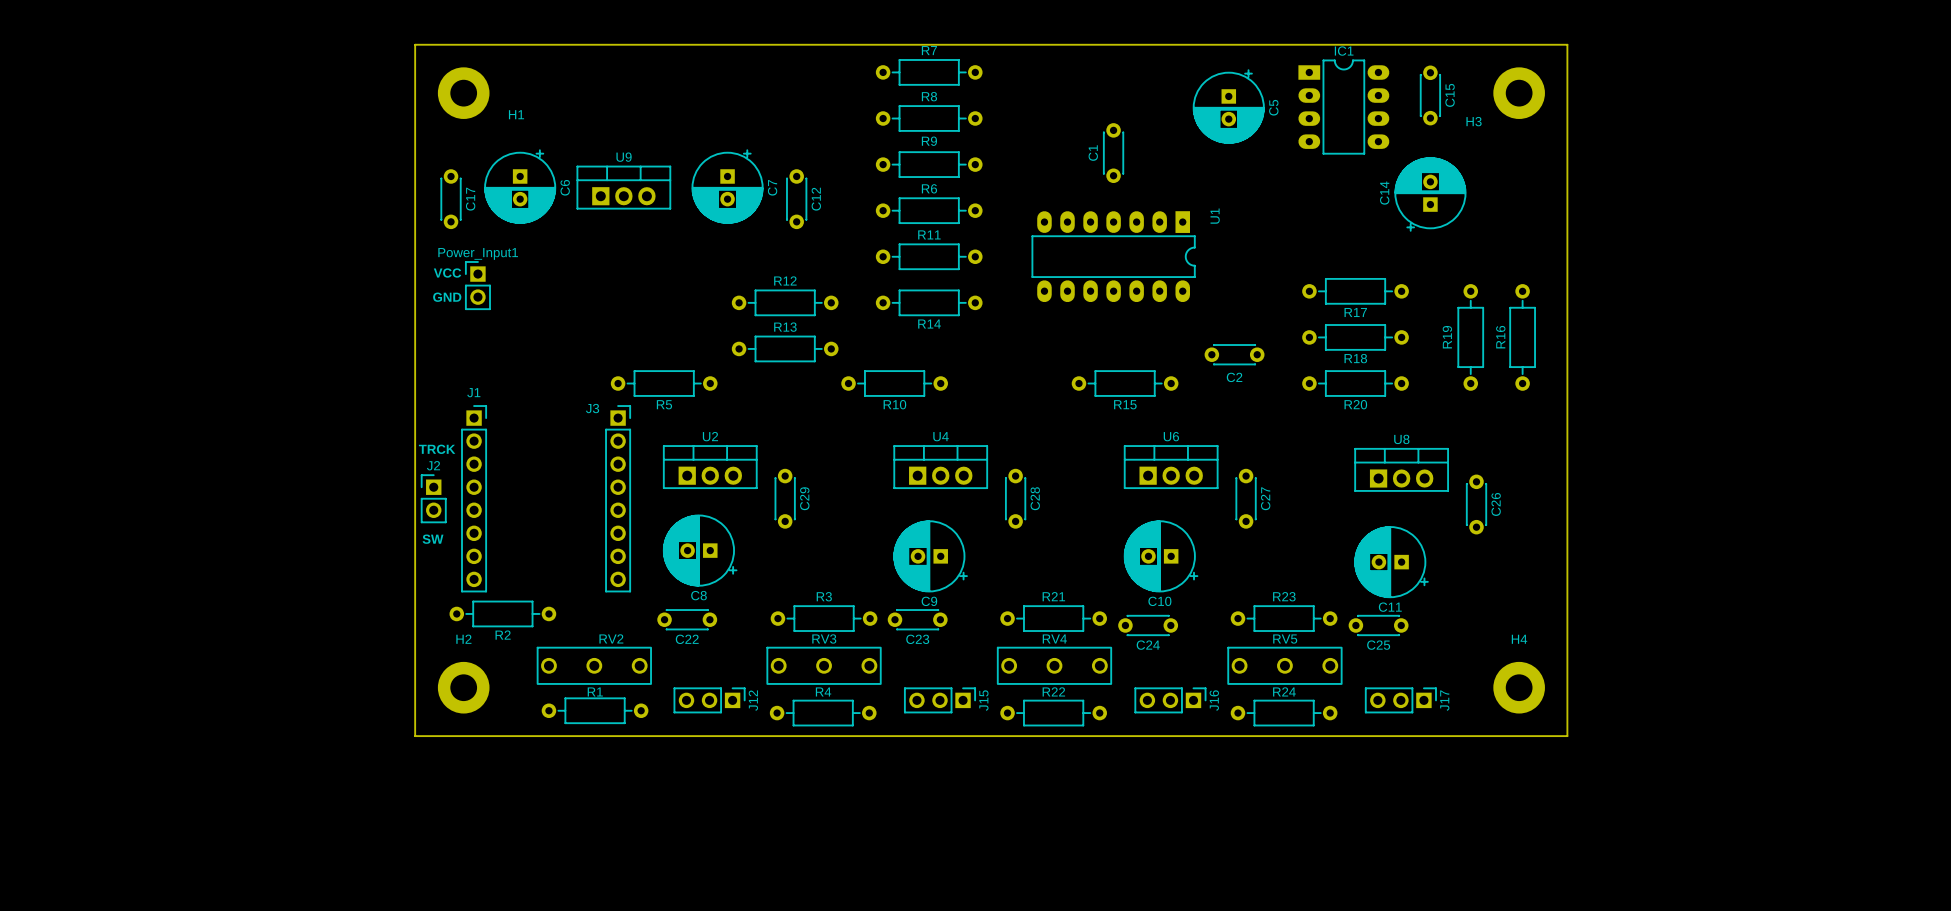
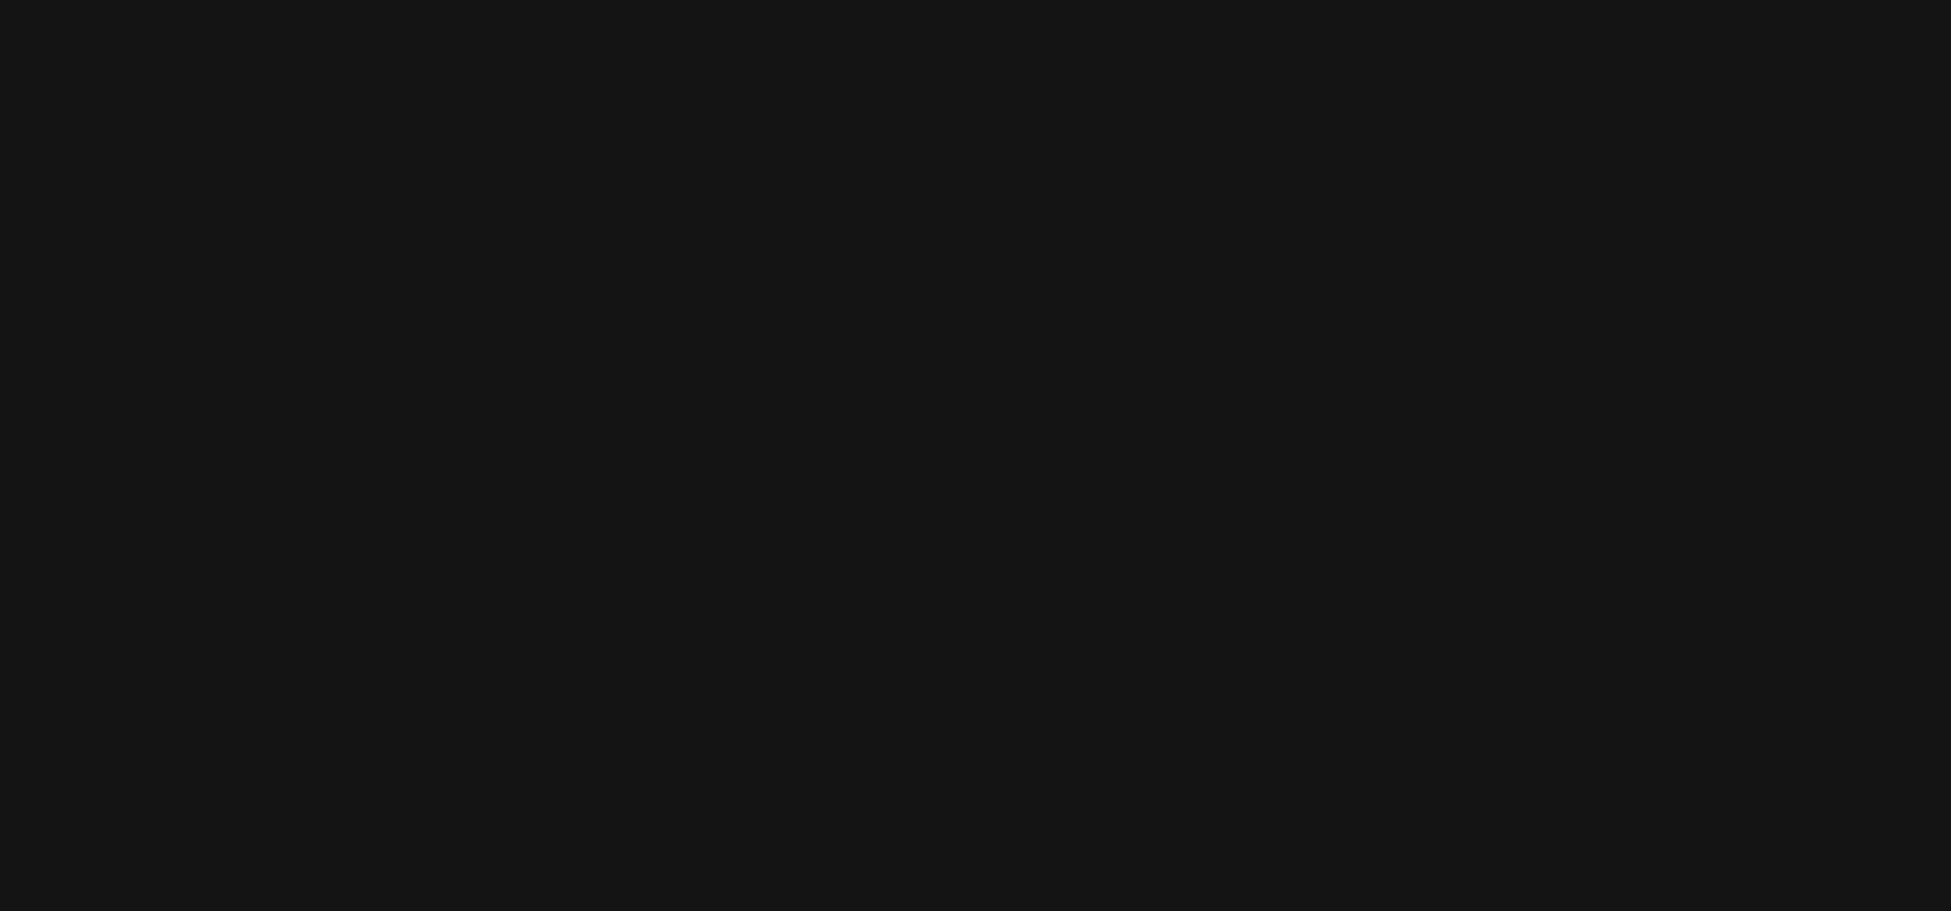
board edge: (415, 44) (1567, 44) (1567, 736) (415, 736) (415, 44) -> none
R7: (929, 72) -> none
H1: (463, 93) -> none
H3: (1519, 93) -> none
C15: (1430, 95) -> none
C5: (1228, 106) -> none
IC1: (1343, 107) -> none
R8: (929, 118) -> none
C1: (1113, 153) -> none
R9: (929, 164) -> none
C6: (520, 186) -> none
C7: (727, 186) -> none
U9: (623, 187) -> none
C14: (1430, 194) -> none
C17: (451, 199) -> none
C12: (796, 199) -> none
R6: (929, 210) -> none
R11: (929, 256) -> none
U1: (1113, 256) -> none
text: VCC (447, 273) -> none
Power_Input1: (477, 285) -> none
R17: (1355, 291) -> none
text: GND (447, 297) -> none
R12: (785, 302) -> none
R14: (929, 302) -> none
R18: (1355, 337) -> none
R19: (1470, 337) -> none
R16: (1522, 337) -> none
R13: (785, 348) -> none
C2: (1234, 354) -> none
R5: (664, 383) -> none
R10: (894, 383) -> none
R15: (1125, 383) -> none
R20: (1355, 383) -> none
text: TRCK (437, 449) -> none
U2: (710, 467) -> none
U4: (940, 467) -> none
U6: (1171, 467) -> none
U8: (1401, 469) -> none
J2: (433, 498) -> none
J1: (474, 498) -> none
J3: (618, 498) -> none
C29: (785, 498) -> none
C28: (1015, 498) -> none
C27: (1246, 498) -> none
C26: (1476, 504) -> none
text: SW (433, 539) -> none
C8: (700, 550) -> none
C9: (930, 556) -> none
C10: (1161, 556) -> none
C11: (1391, 562) -> none
R2: (502, 613) -> none
R3: (824, 618) -> none
R21: (1053, 618) -> none
R23: (1284, 618) -> none
C22: (687, 619) -> none
C23: (917, 619) -> none
C24: (1148, 625) -> none
C25: (1378, 625) -> none
RV2: (594, 665) -> none
RV3: (824, 665) -> none
RV4: (1054, 665) -> none
RV5: (1284, 665) -> none
H2: (463, 687) -> none
H4: (1519, 687) -> none
J12: (709, 700) -> none
J15: (939, 700) -> none
J16: (1170, 700) -> none
J17: (1400, 700) -> none
R1: (595, 710) -> none
R4: (823, 713) -> none
R22: (1053, 713) -> none
R24: (1284, 713) -> none

